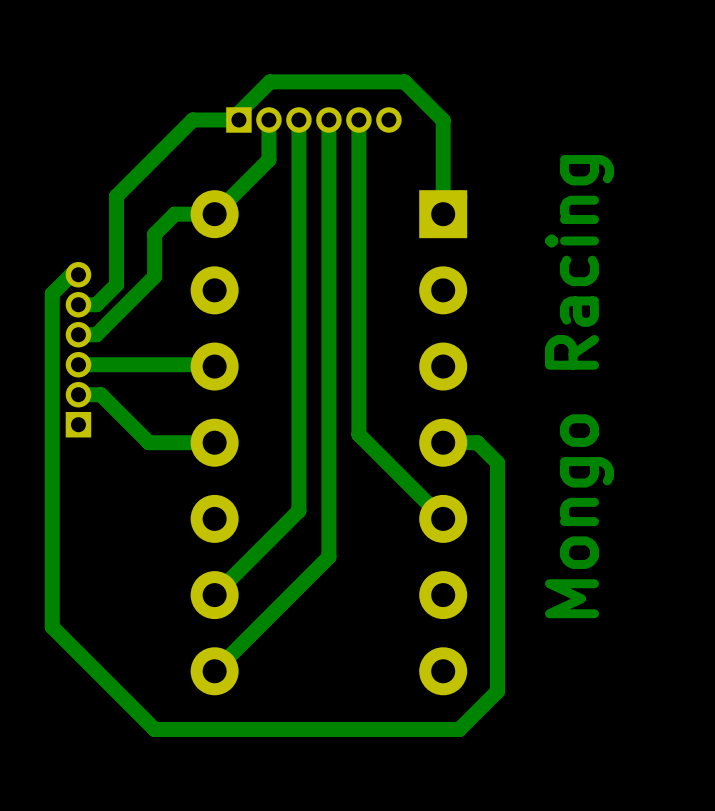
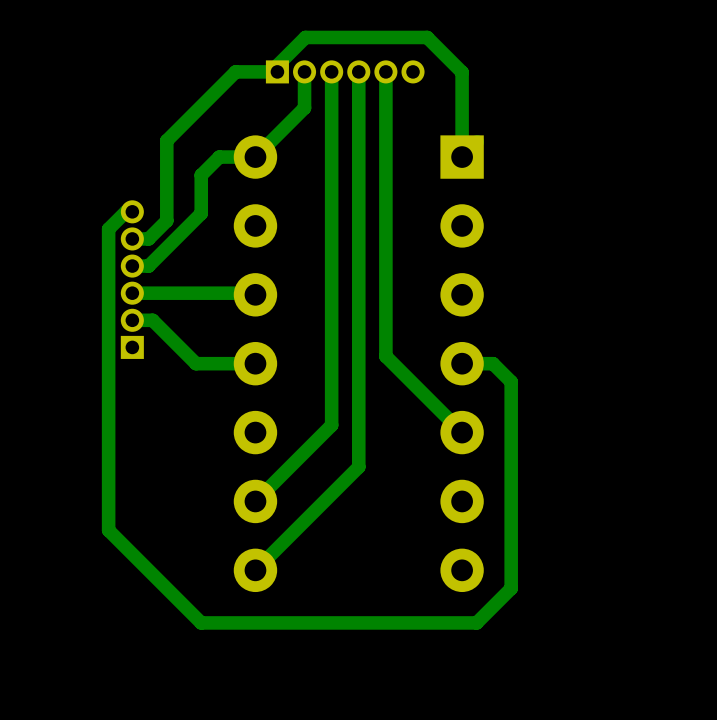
text: Mongo Racing (579, 386) -> none

